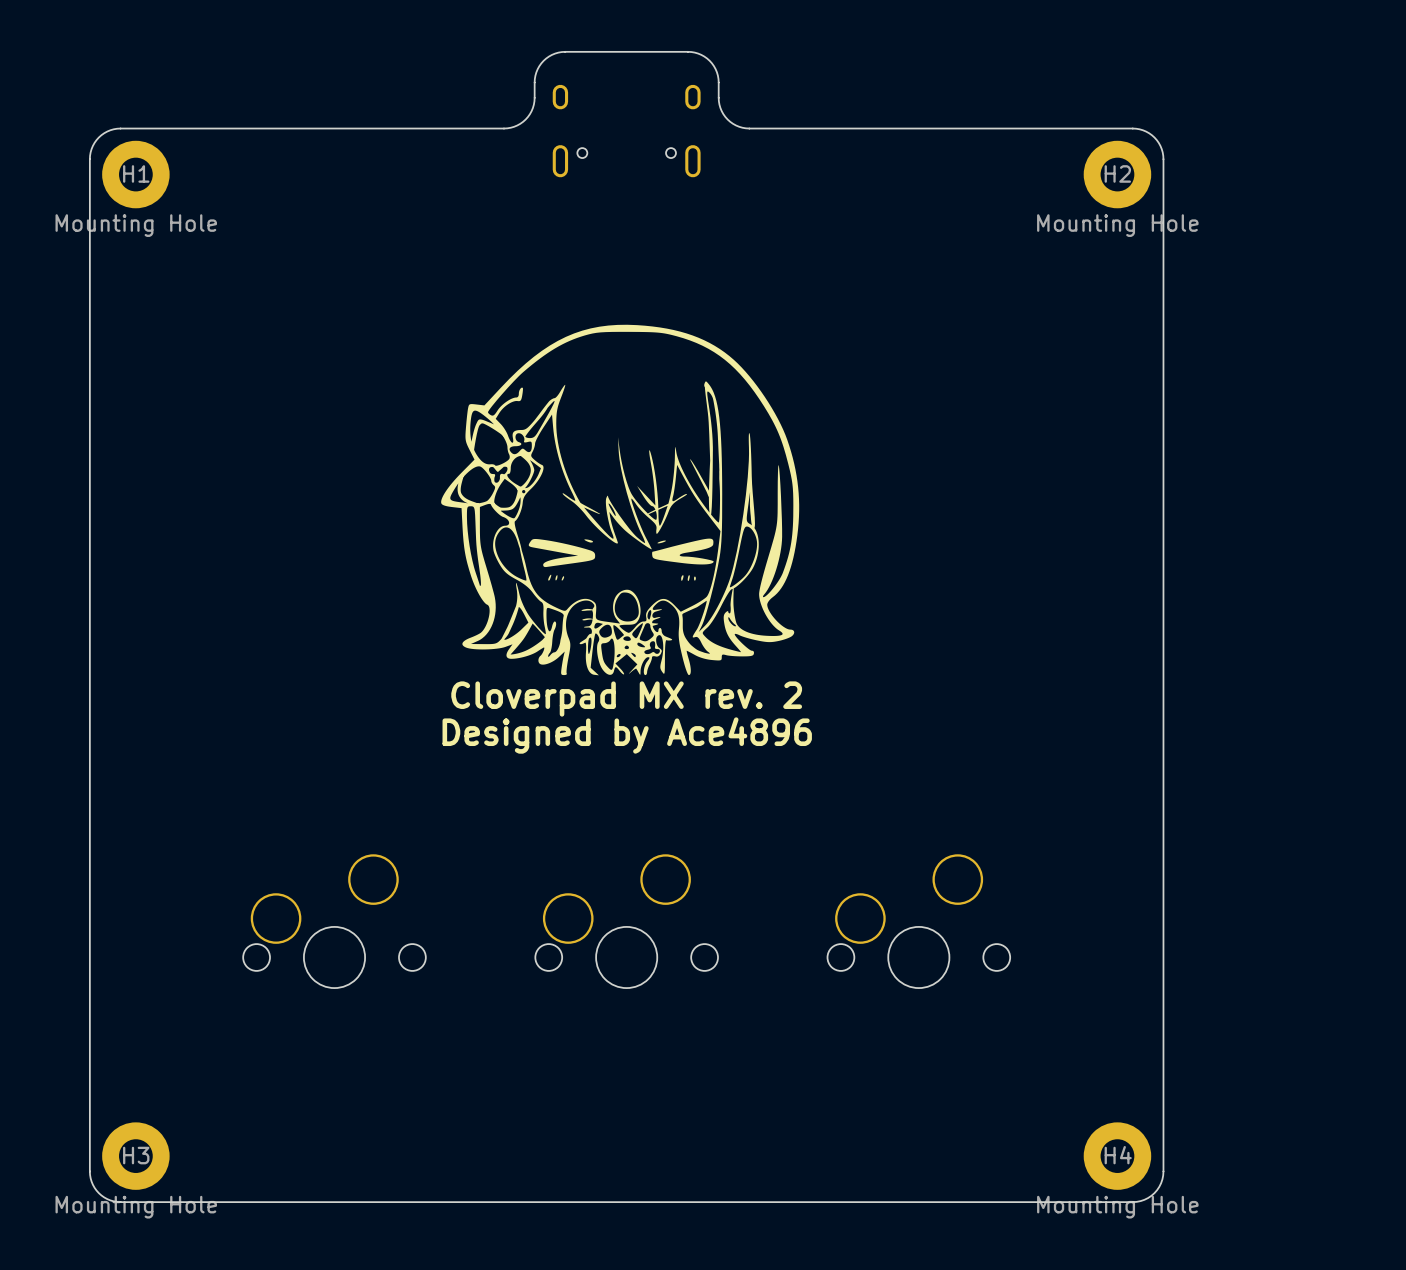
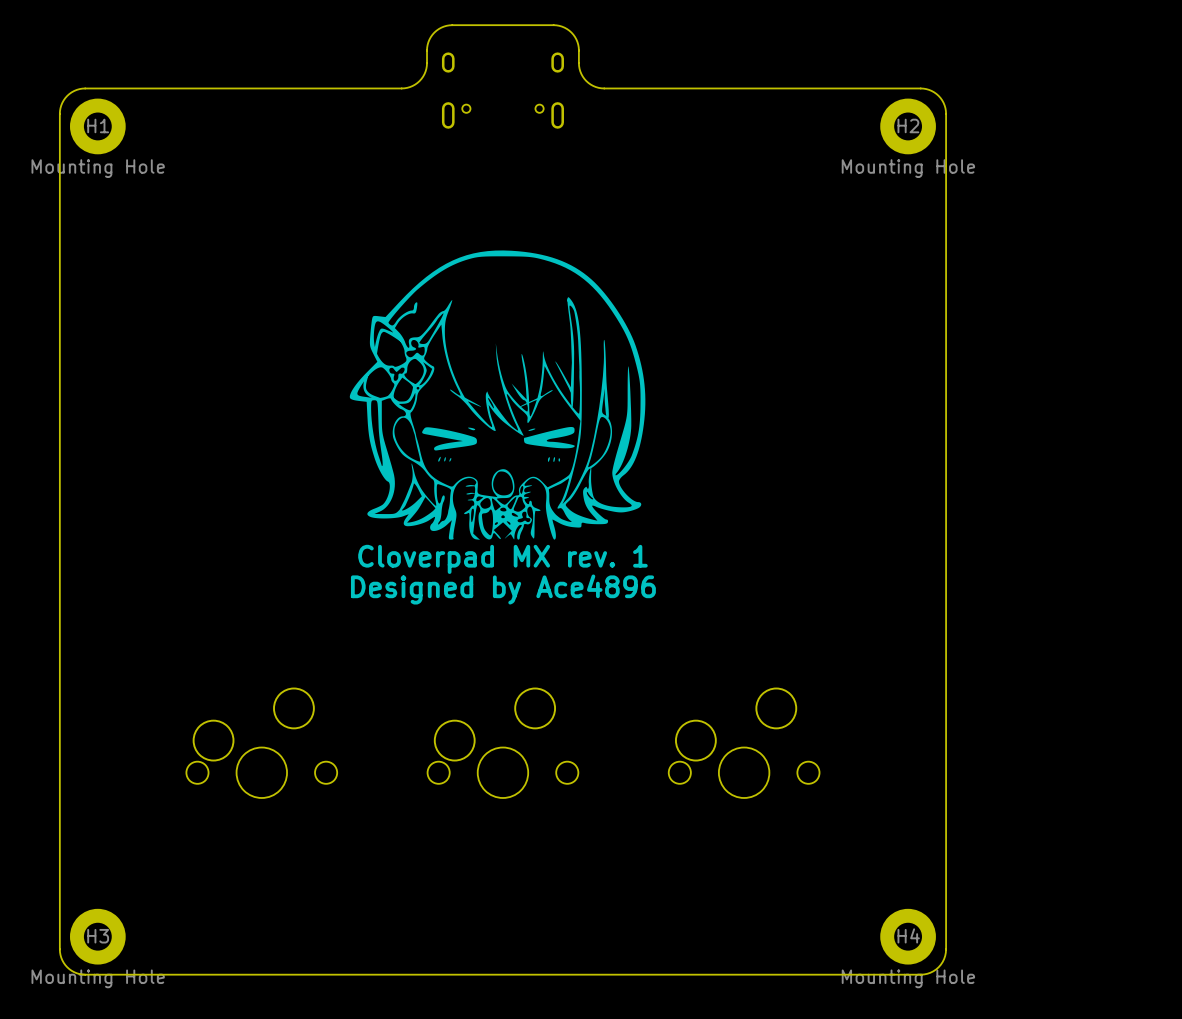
text: Cloverpad MX rev. 2 (626, 699) -> Cloverpad MX rev. 1 (502, 559)

